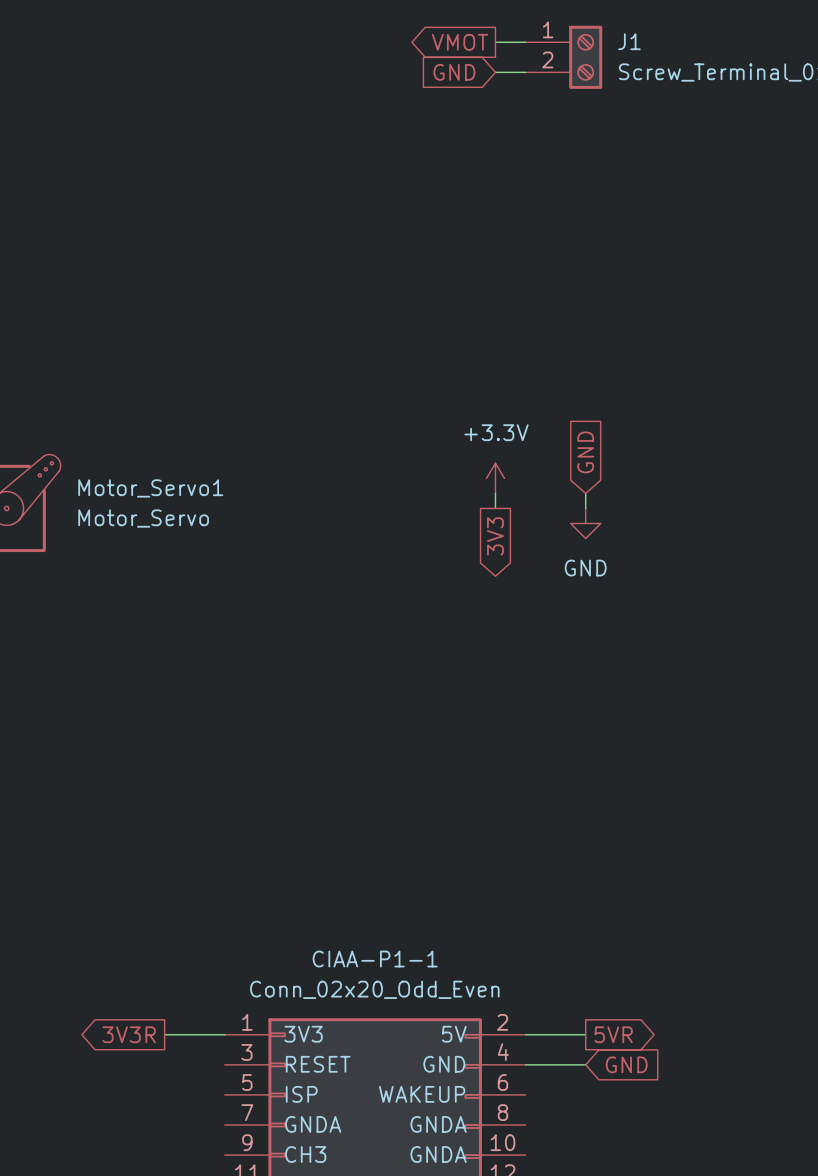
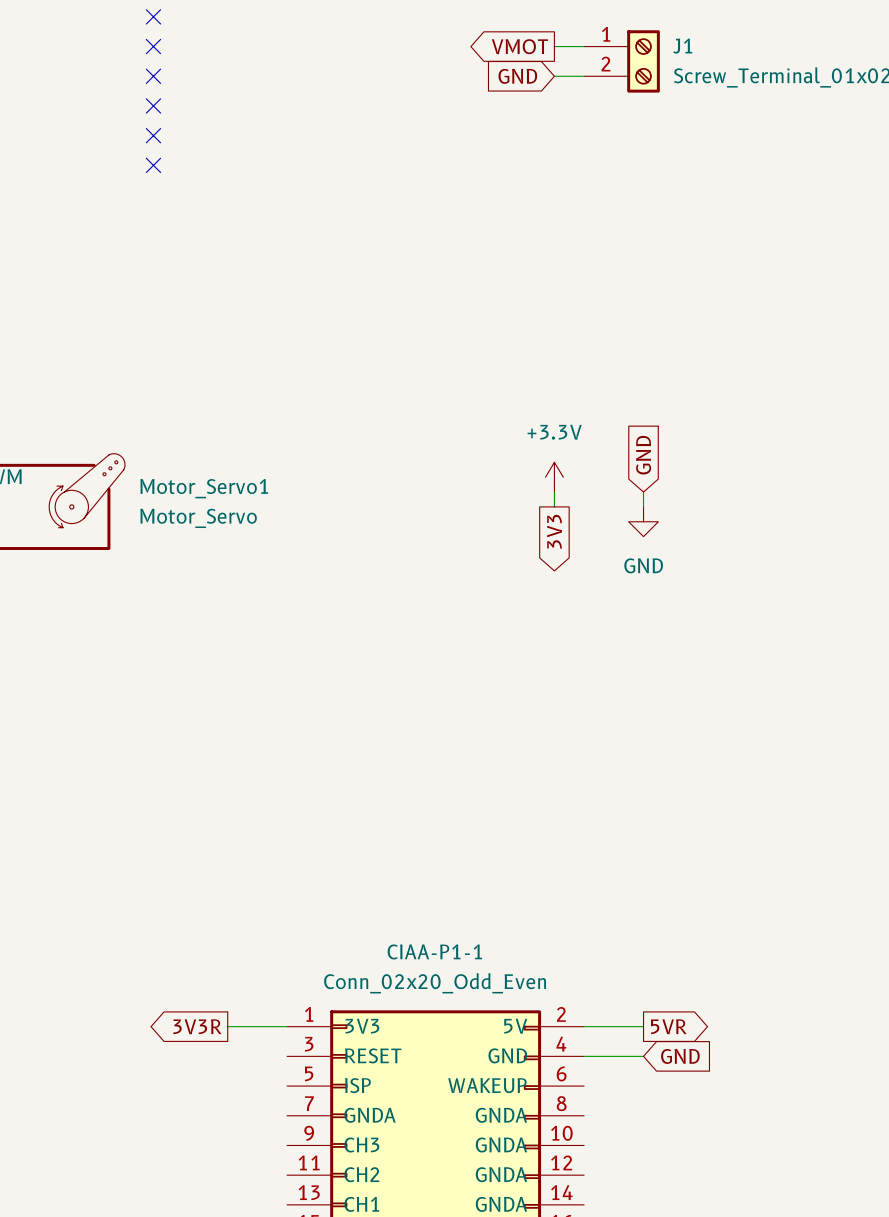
no-connect mark: none -> (153, 16)
no-connect mark: none -> (153, 46)
no-connect mark: none -> (153, 76)
no-connect mark: none -> (153, 105)
no-connect mark: none -> (153, 135)
no-connect mark: none -> (153, 165)

